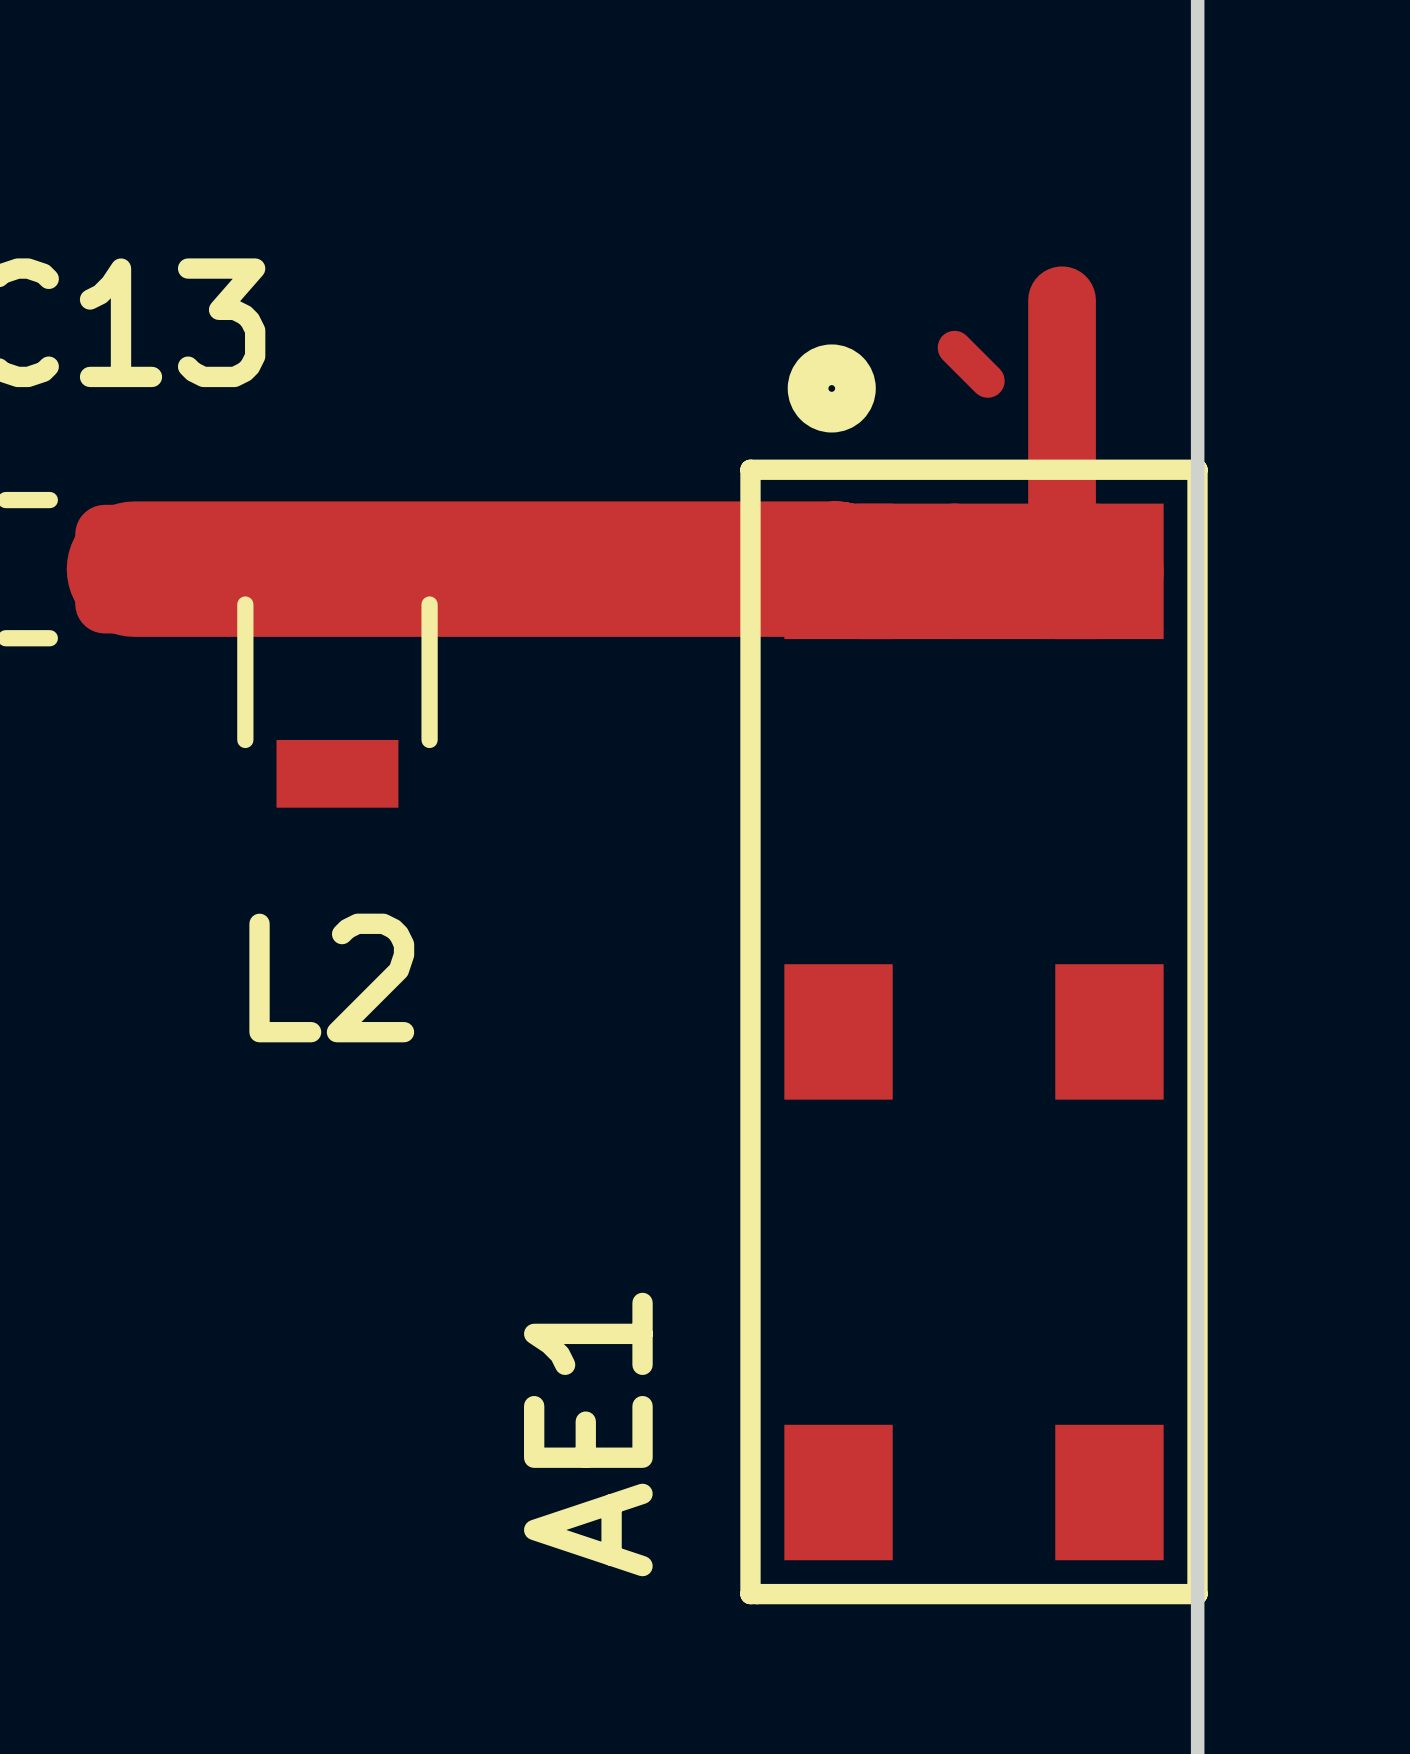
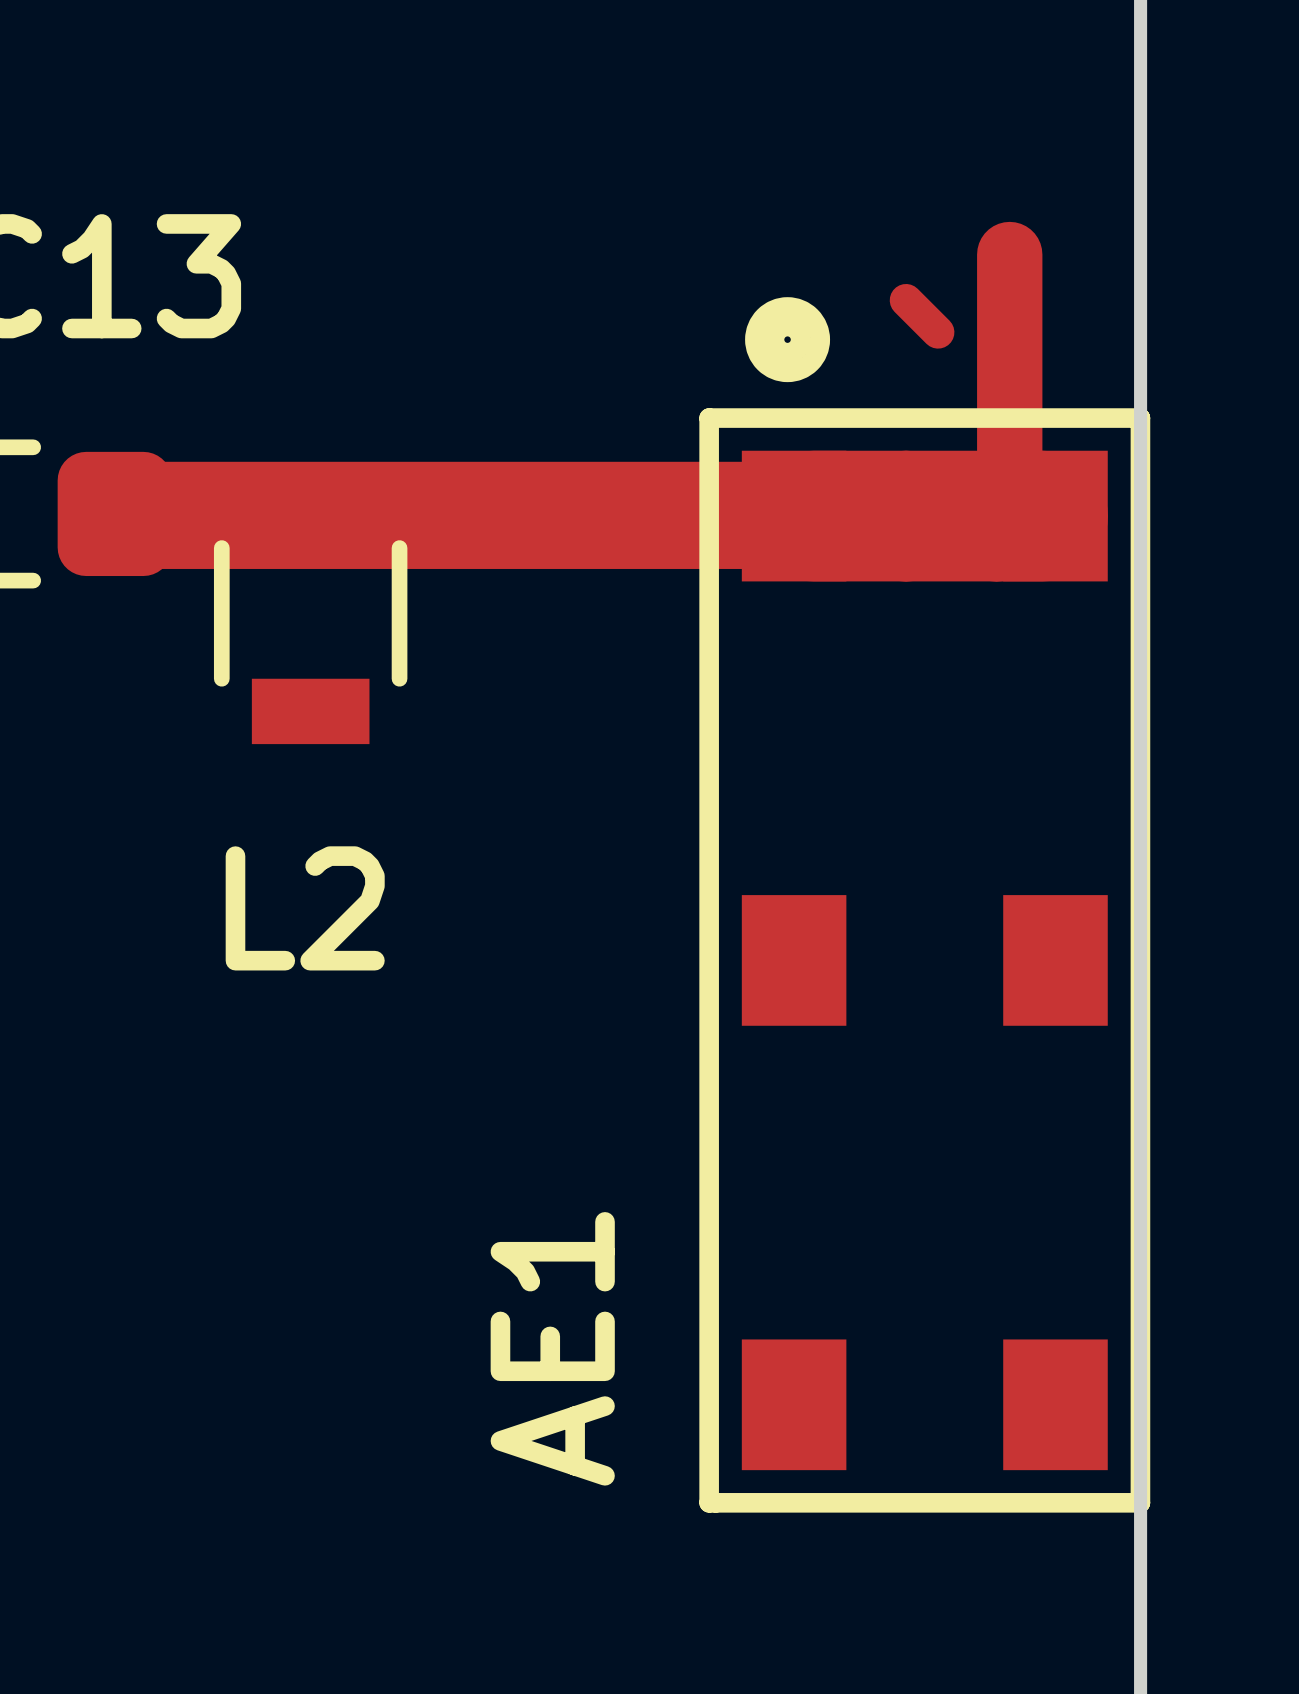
track: (134, 569) (836, 569) (838, 571) -> (116, 515) (813, 515)

